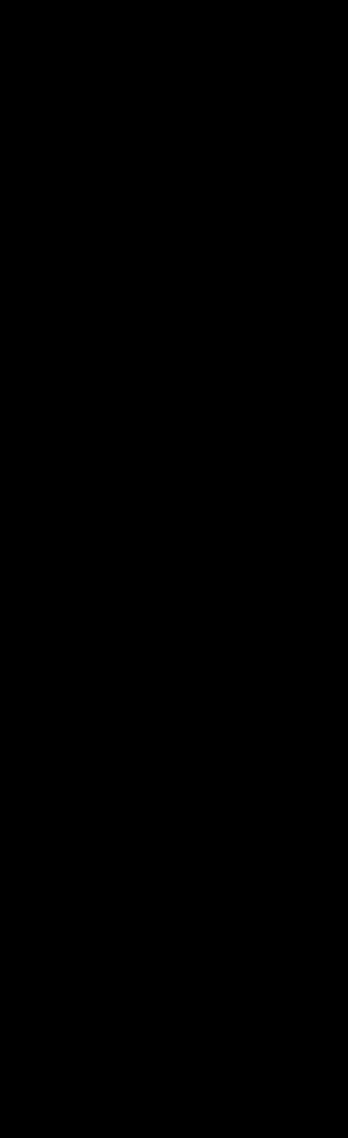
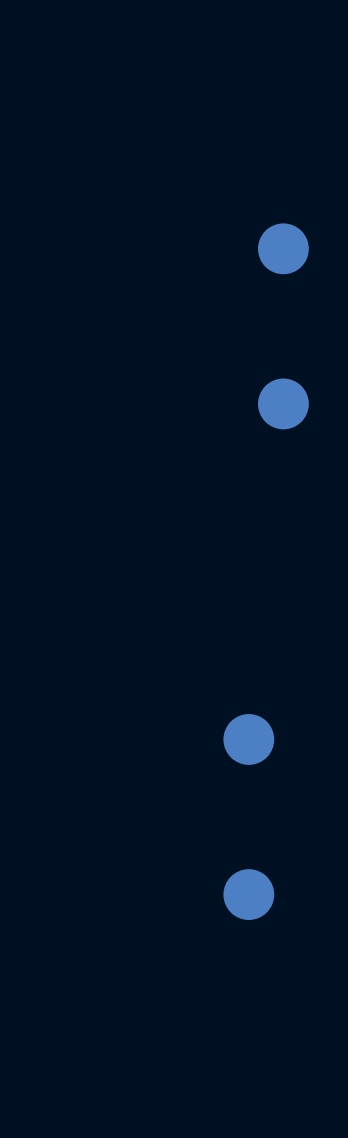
part: none -> (283, 248)
part: none -> (283, 403)
part: none -> (248, 739)
part: none -> (248, 894)

